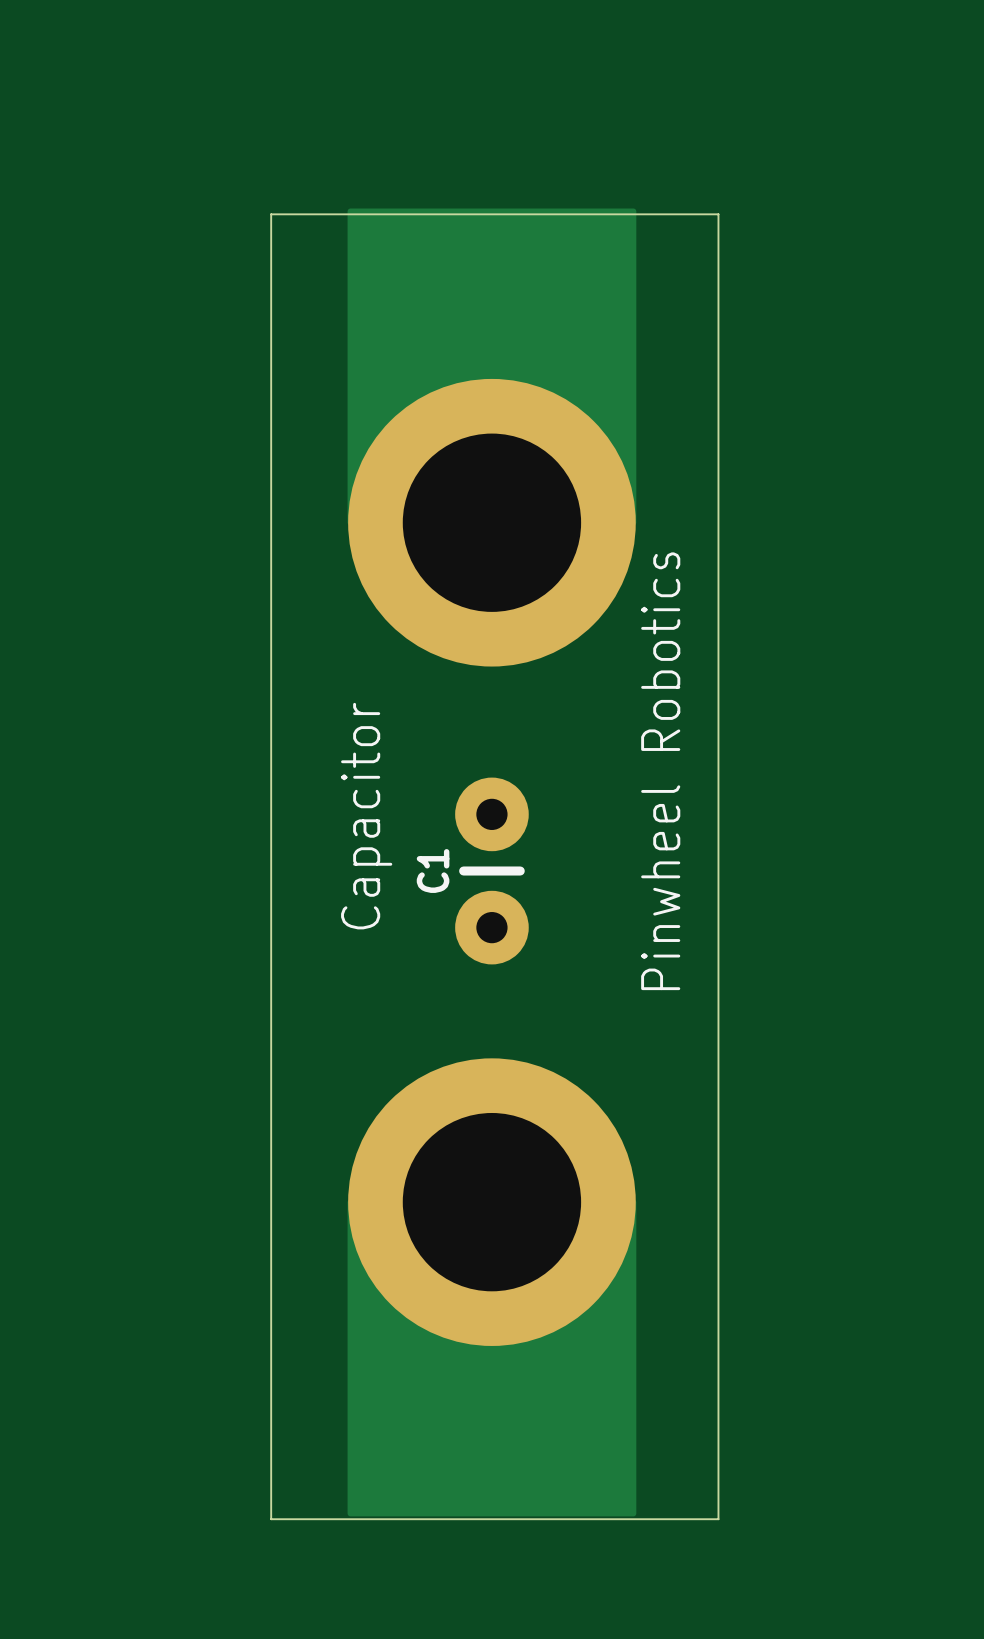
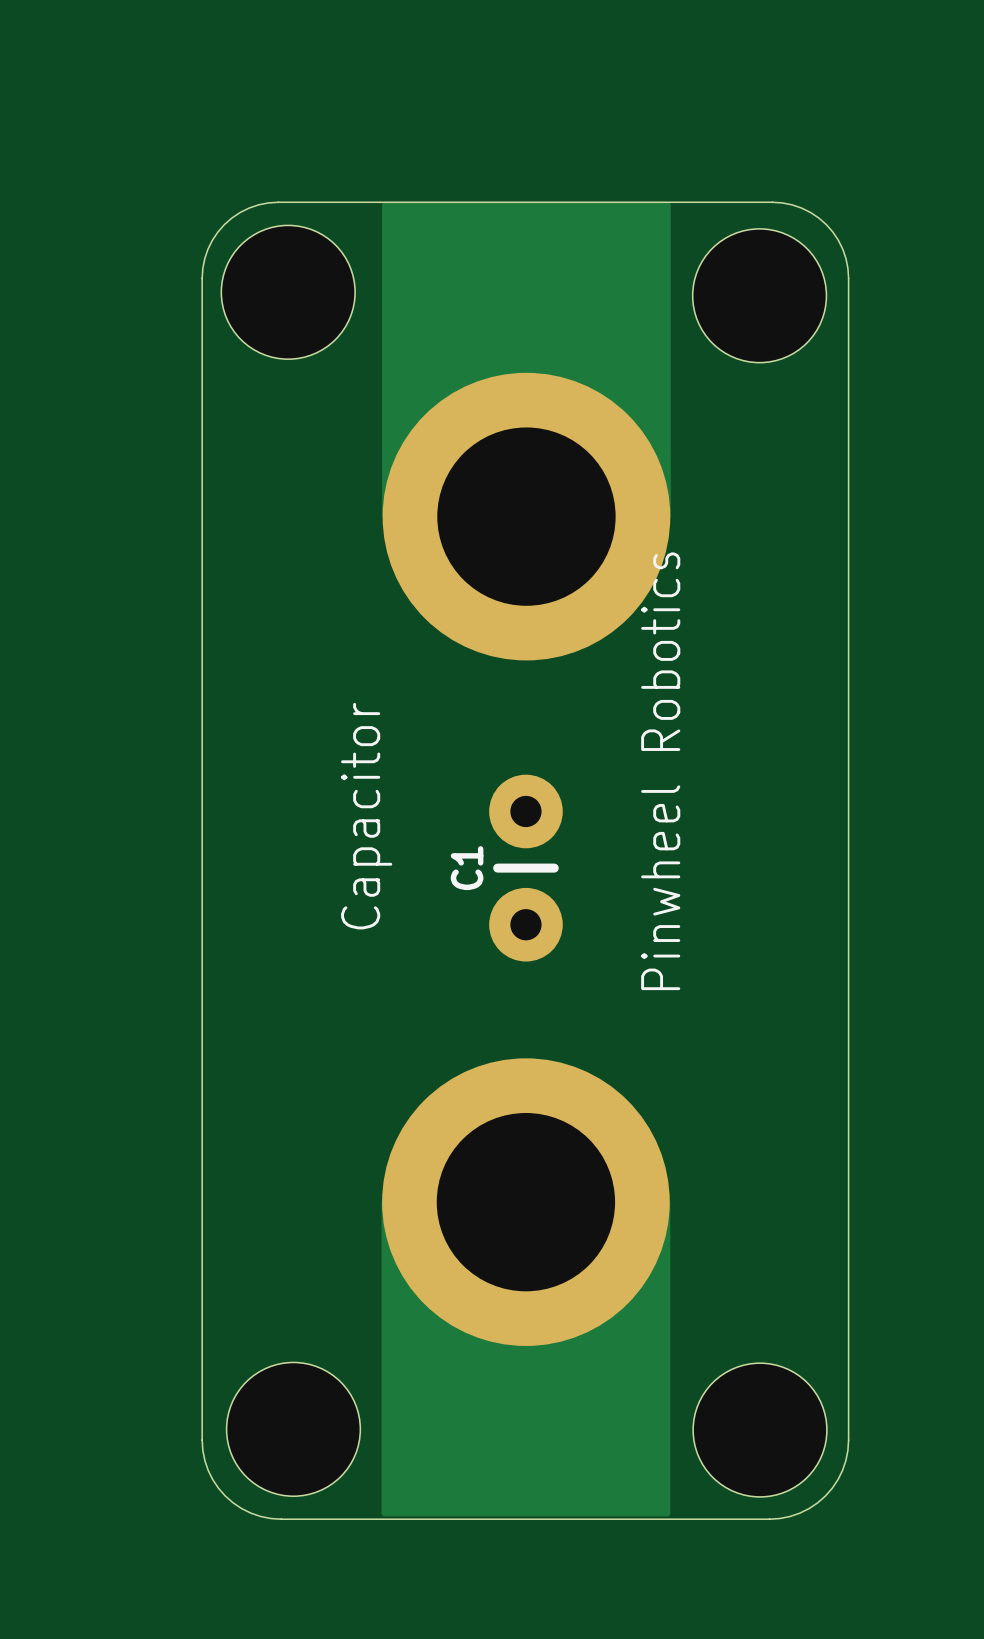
hole: none -> (288, 292)
hole: none -> (759, 295)
part position: (491, 437) -> (526, 431)
C1 position: (491, 871) -> (525, 868)
part position: (491, 1287) -> (525, 1287)
hole: none -> (293, 1429)
hole: none -> (760, 1430)
board edge: (281, 1519) (271, 1519) (271, 214) (718, 214) (718, 1519) -> (281, 1519) (251, 1513) (225, 1496) (208, 1470) (202, 1440) (202, 278) (207, 249) (217, 232) (231, 218) (249, 208) (268, 202) (772, 202) (801, 208) (826, 224) (842, 249) (848, 278) (848, 1440) (845, 1460) (837, 1479) (825, 1496) (809, 1508) (779, 1518) (718, 1519)

